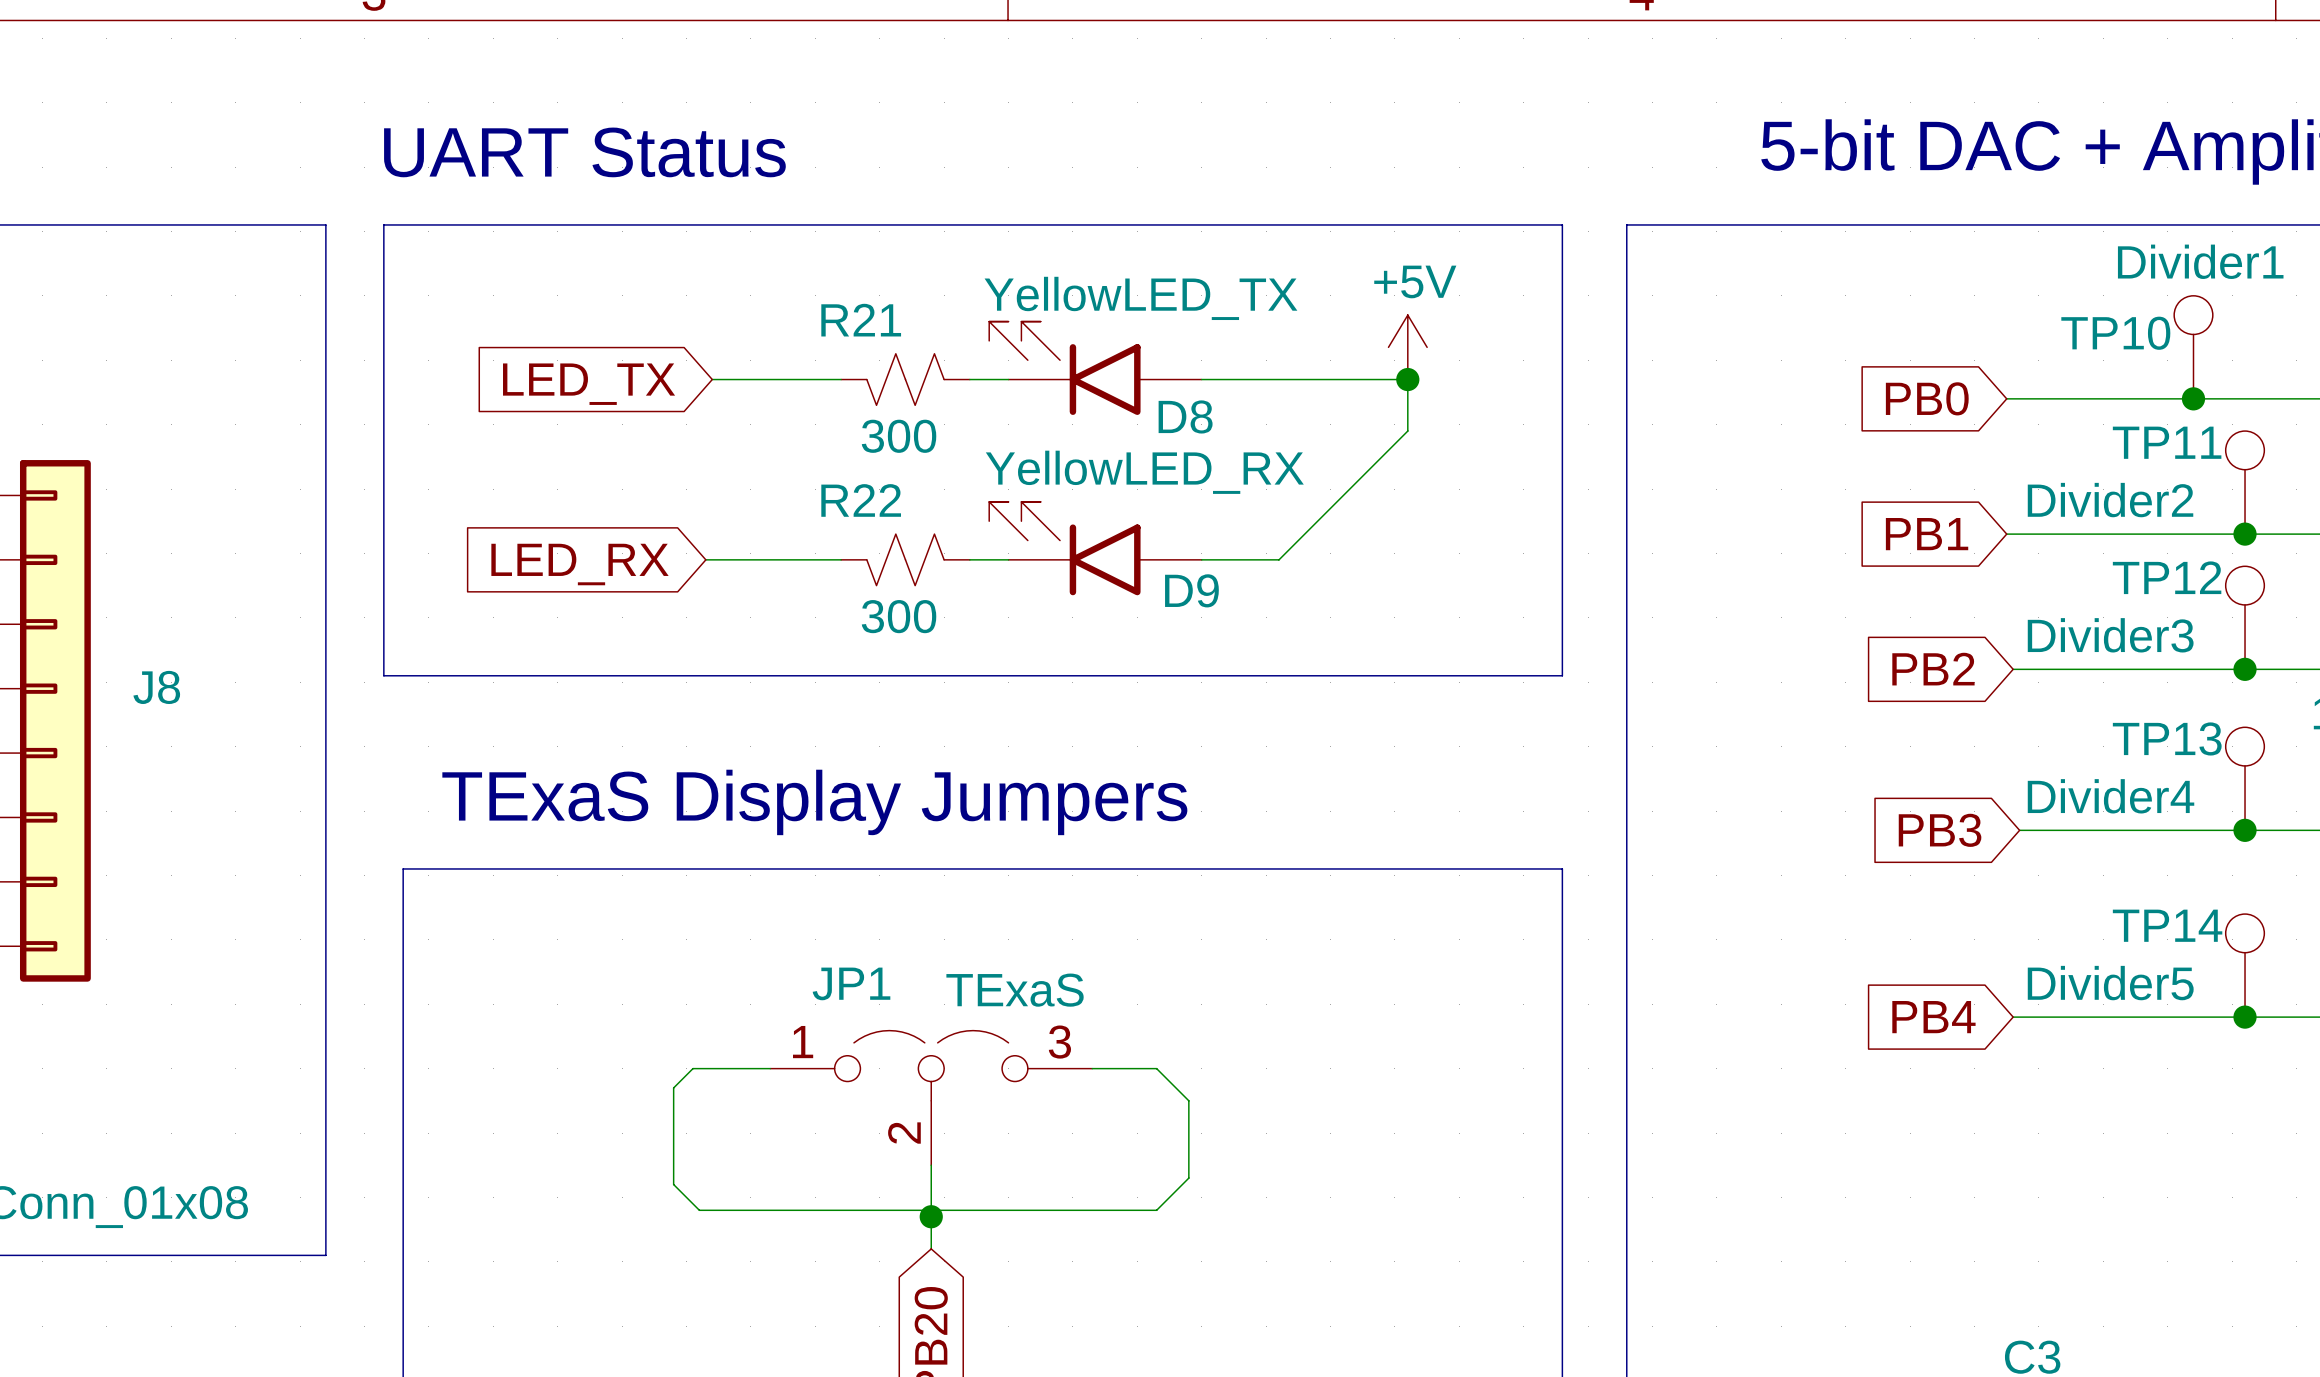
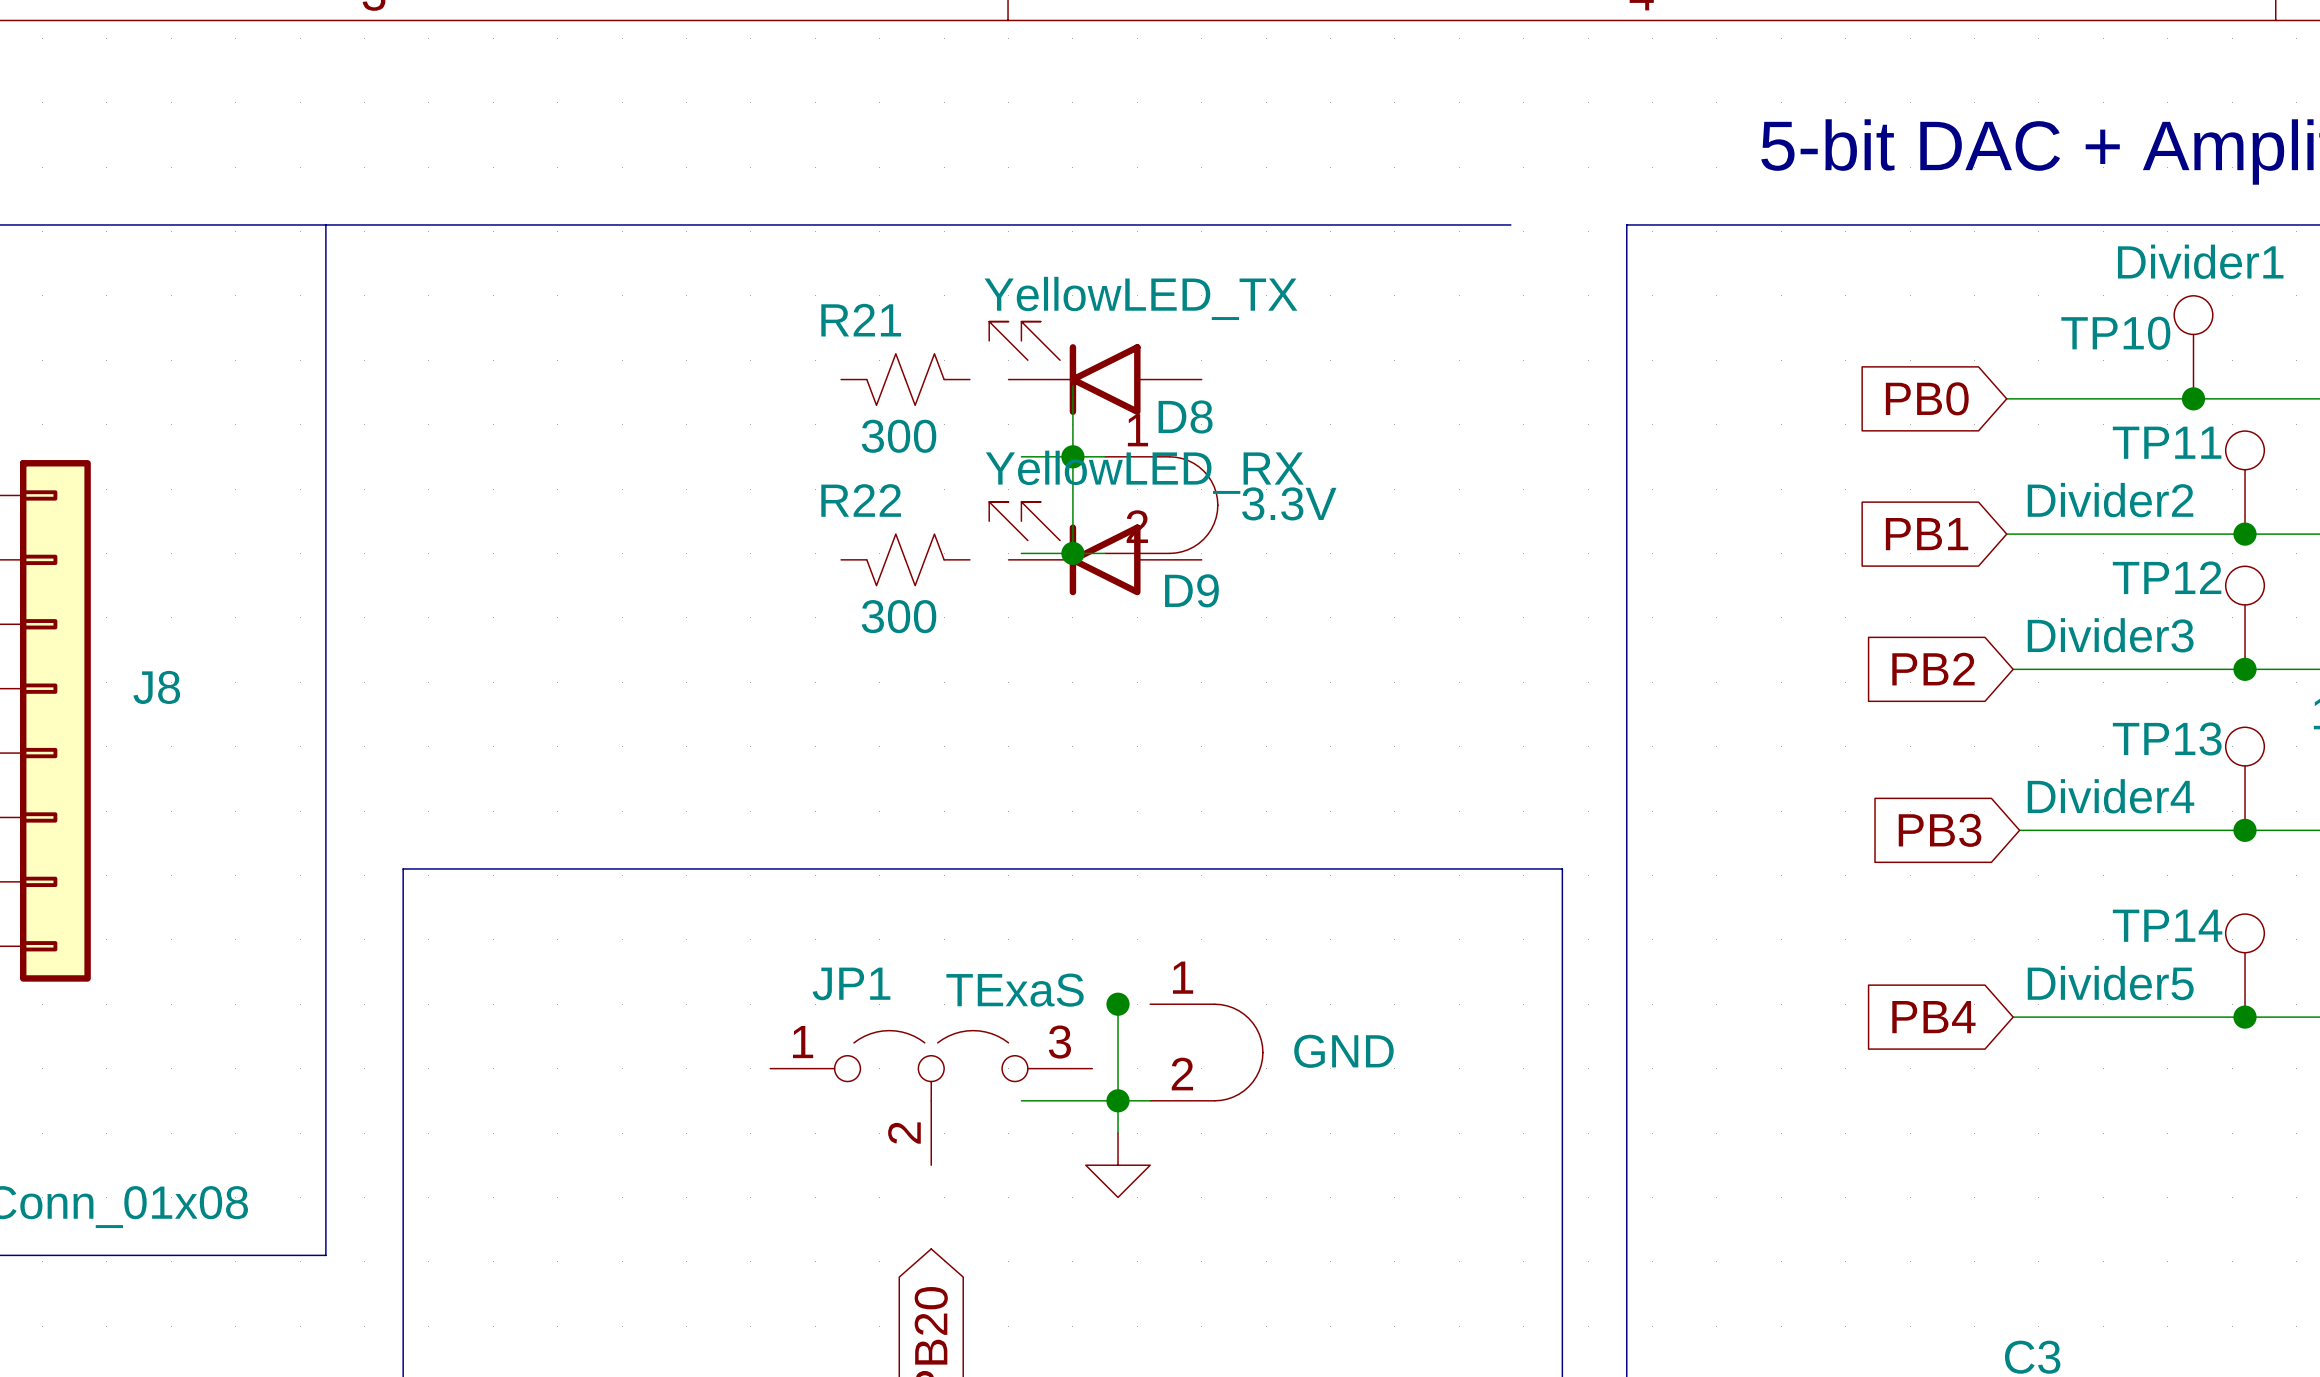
text: UART Status (584, 152) -> none
line: (383, 224) (383, 675) (1562, 675) (1562, 224) (1510, 224) -> (383, 224) (325, 224)
power symbol: +5V (1407, 347) -> none
wire: (712, 379) (841, 379) -> none
wire: (969, 379) (1008, 379) -> none
wire: (1201, 379) (1407, 379) (1407, 431) (1279, 559) (1201, 559) -> none
junction: (1407, 379) -> none
global label: LED_TX (589, 384) -> none
wire: none -> (1072, 385) (1072, 553)
wire: none -> (1021, 456) (1105, 456)
junction: none -> (1072, 456)
part: none -> 3.3V (1161, 505)
wire: none -> (1021, 553) (1105, 553)
junction: none -> (1072, 553)
wire: (705, 559) (841, 559) -> none
wire: (969, 559) (1008, 559) -> none
global label: LED_RX (580, 564) -> none
text: TExaS Display Jumpers (814, 802) -> none
wire: none -> (1118, 1004) (1118, 1133)
junction: none -> (1118, 1004)
part: none -> GND (1206, 1052)
wire: (770, 1068) (692, 1068) (673, 1087) (673, 1184) (699, 1210) (924, 1210) (931, 1216) (937, 1210) (1156, 1210) (1188, 1178) (1188, 1100) (1156, 1068) (1092, 1068) -> none
wire: none -> (1021, 1100) (1150, 1100)
junction: none -> (1118, 1100)
wire: (931, 1165) (931, 1248) -> none
power symbol: none -> (1118, 1165)
junction: (931, 1216) -> none

